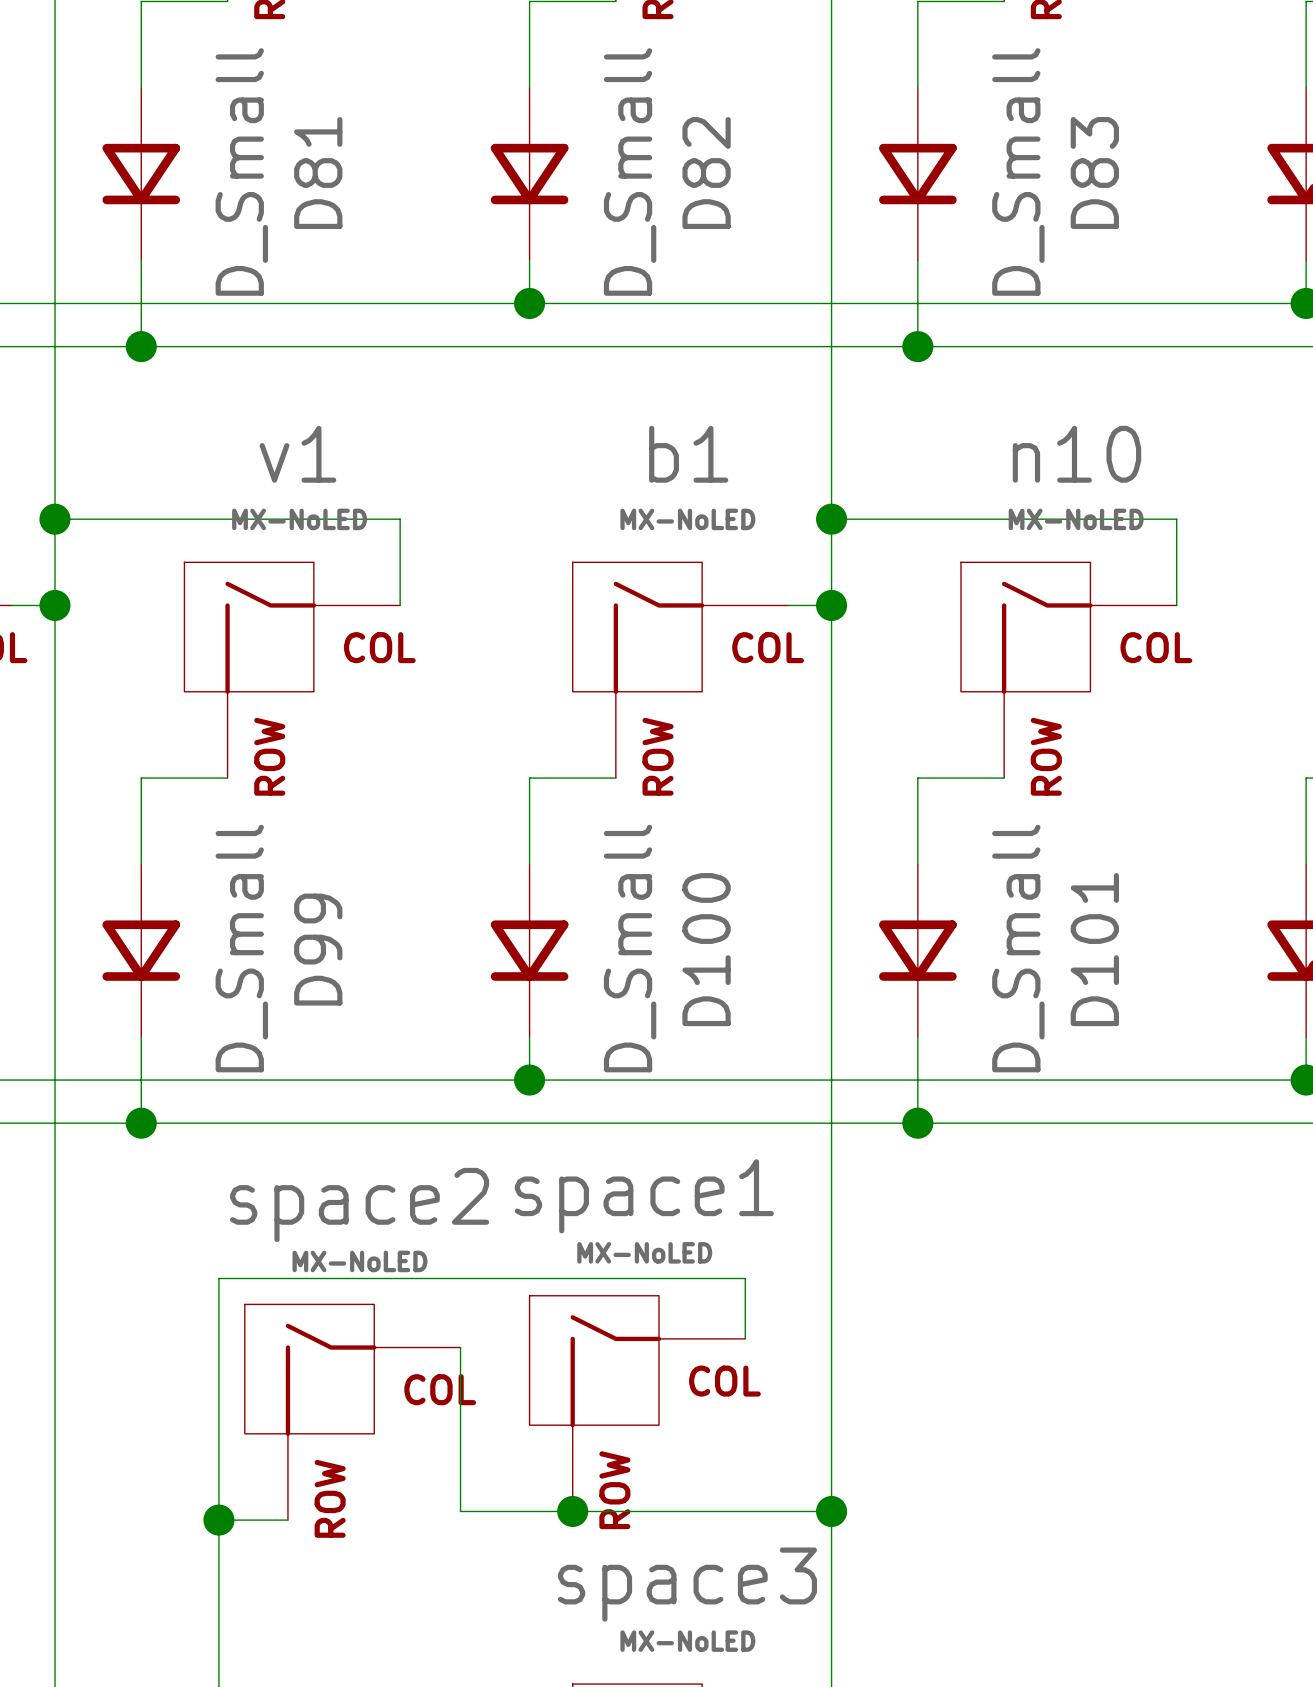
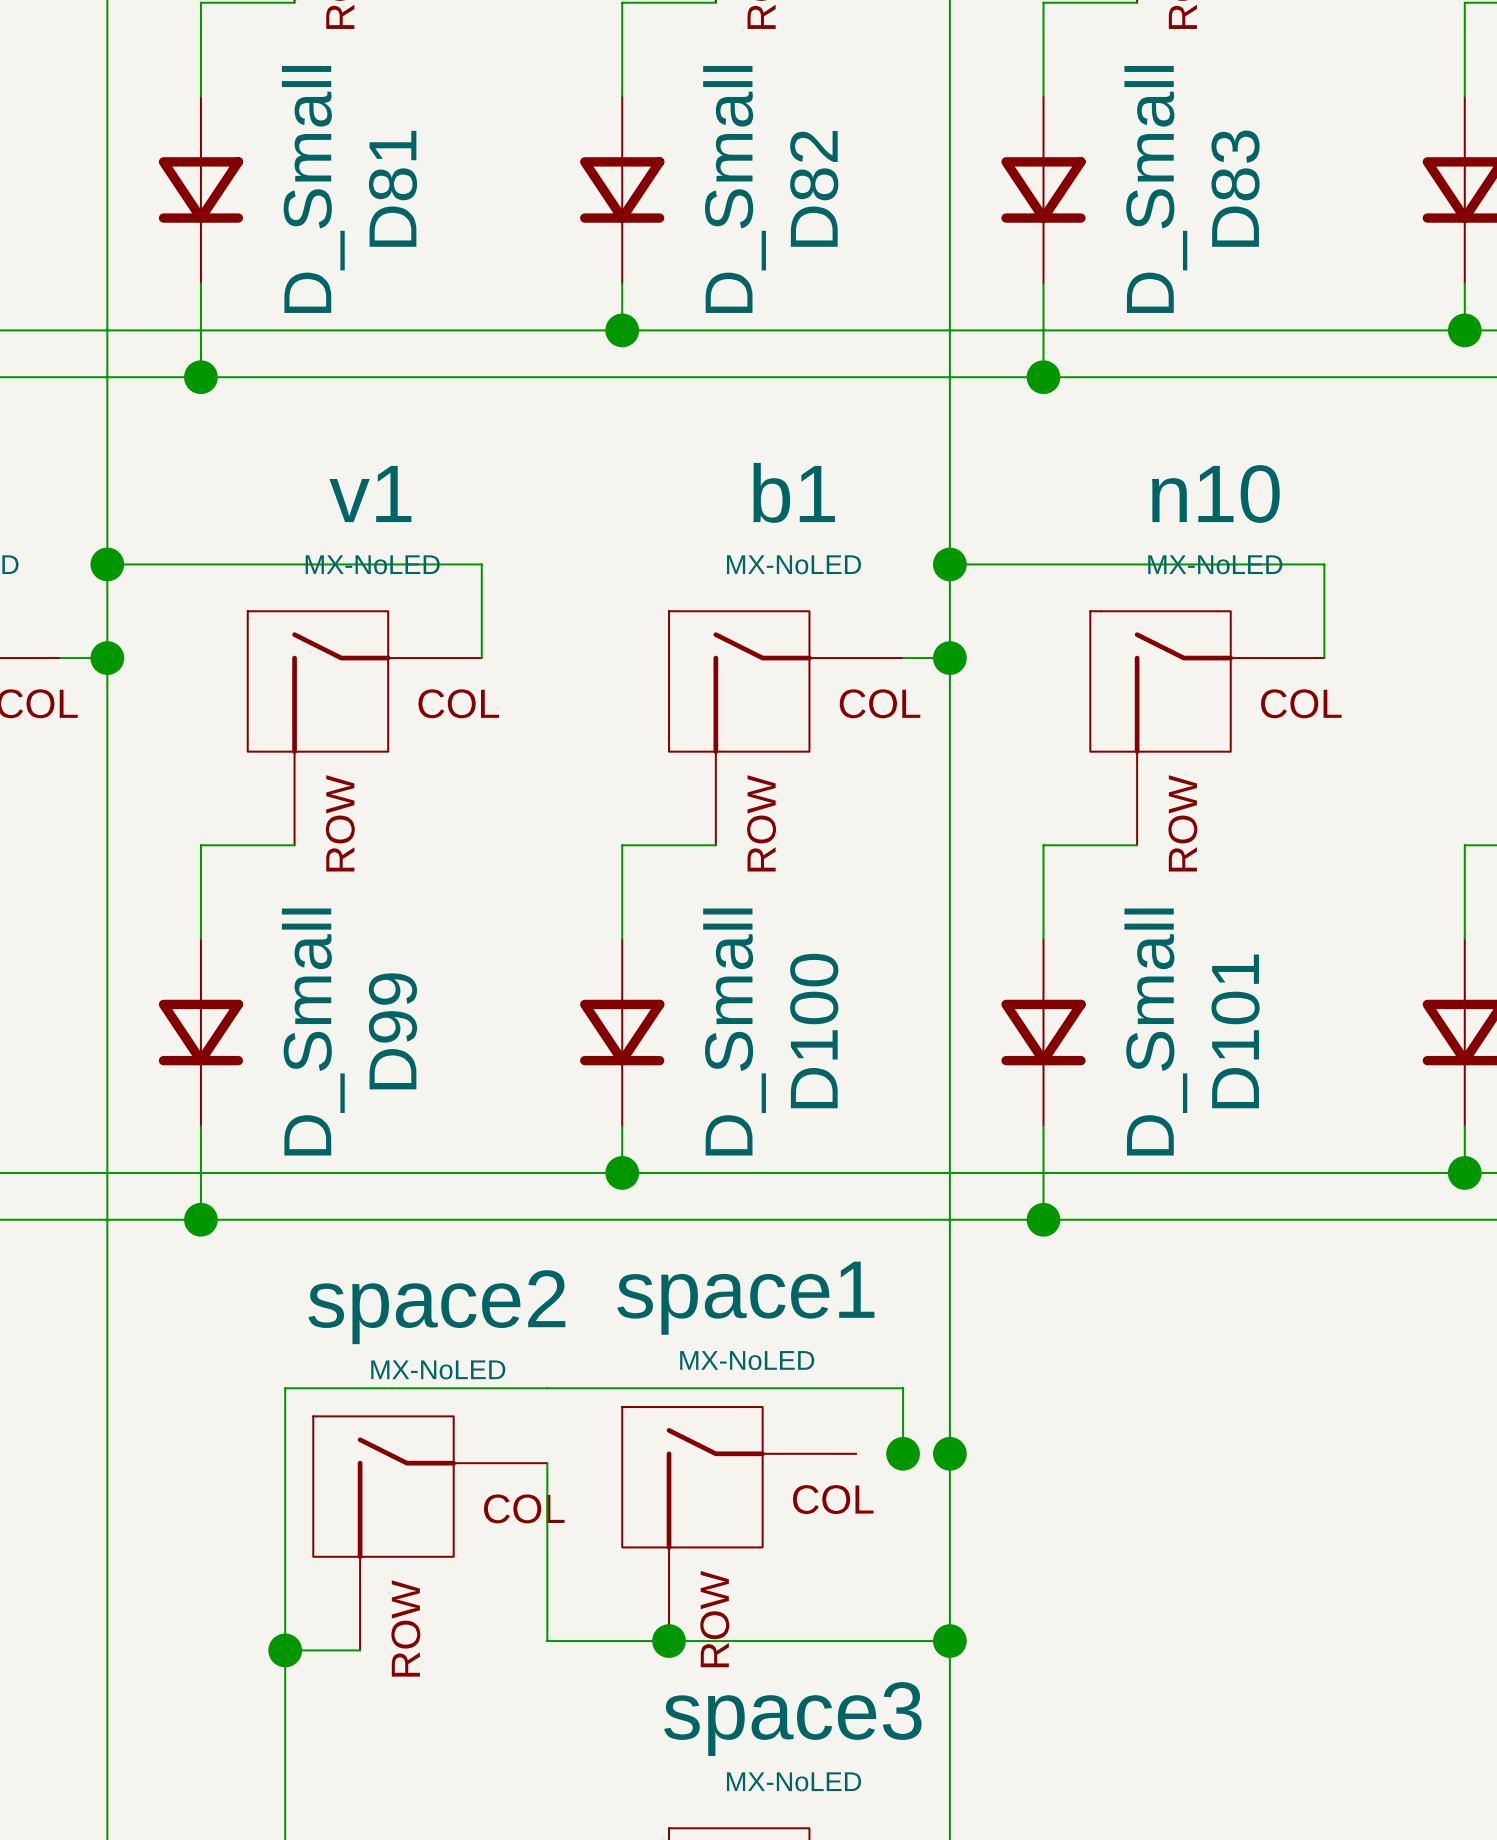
wire: (745, 1278) (745, 1338) -> (856, 1388) (903, 1388) (903, 1453)
junction: none -> (903, 1453)
junction: none -> (949, 1453)

